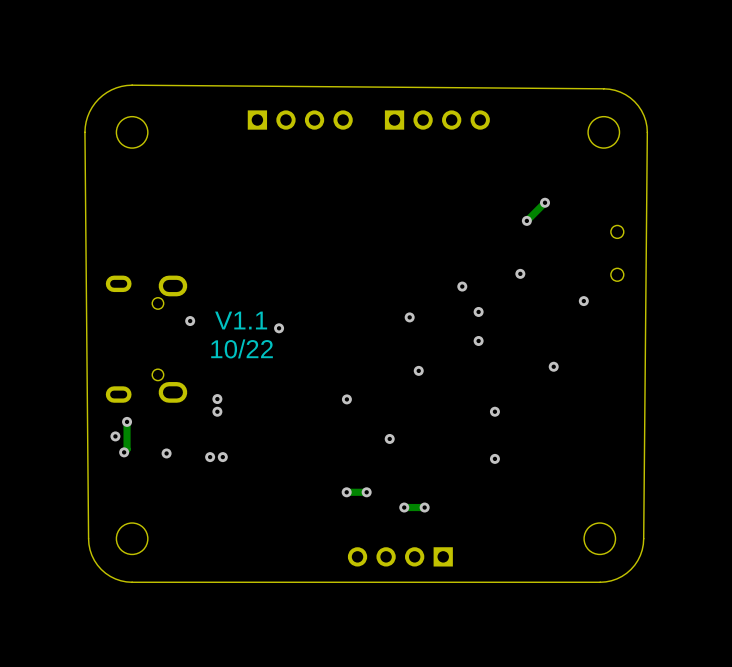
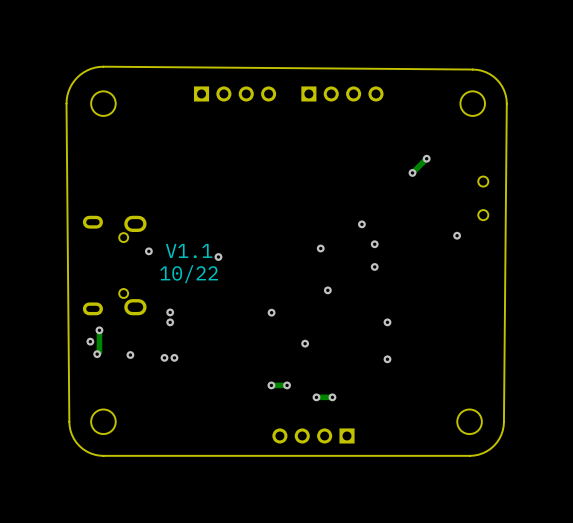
via: (520, 273) -> none
via: (553, 366) -> none

